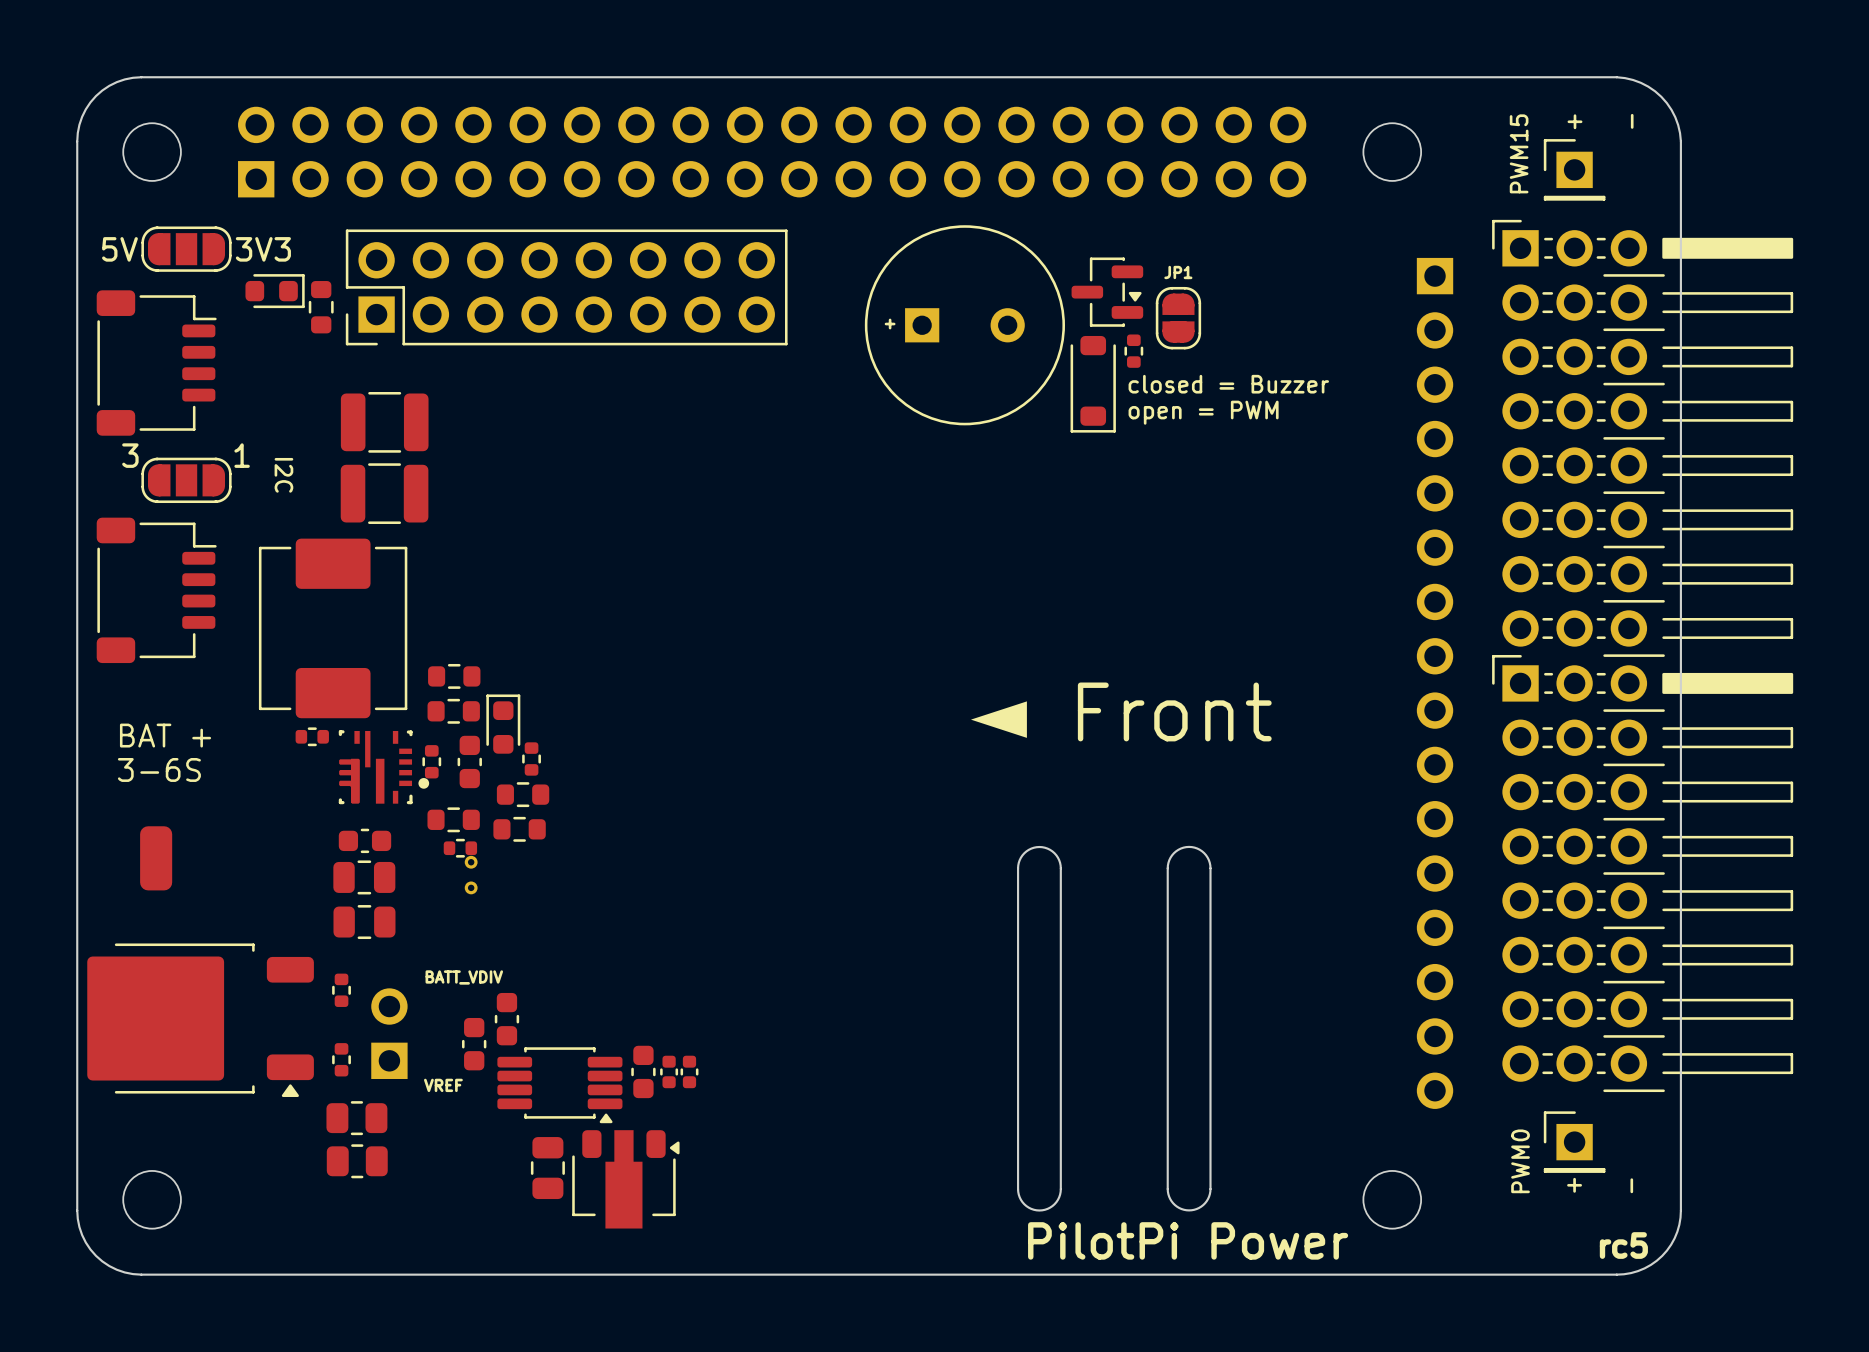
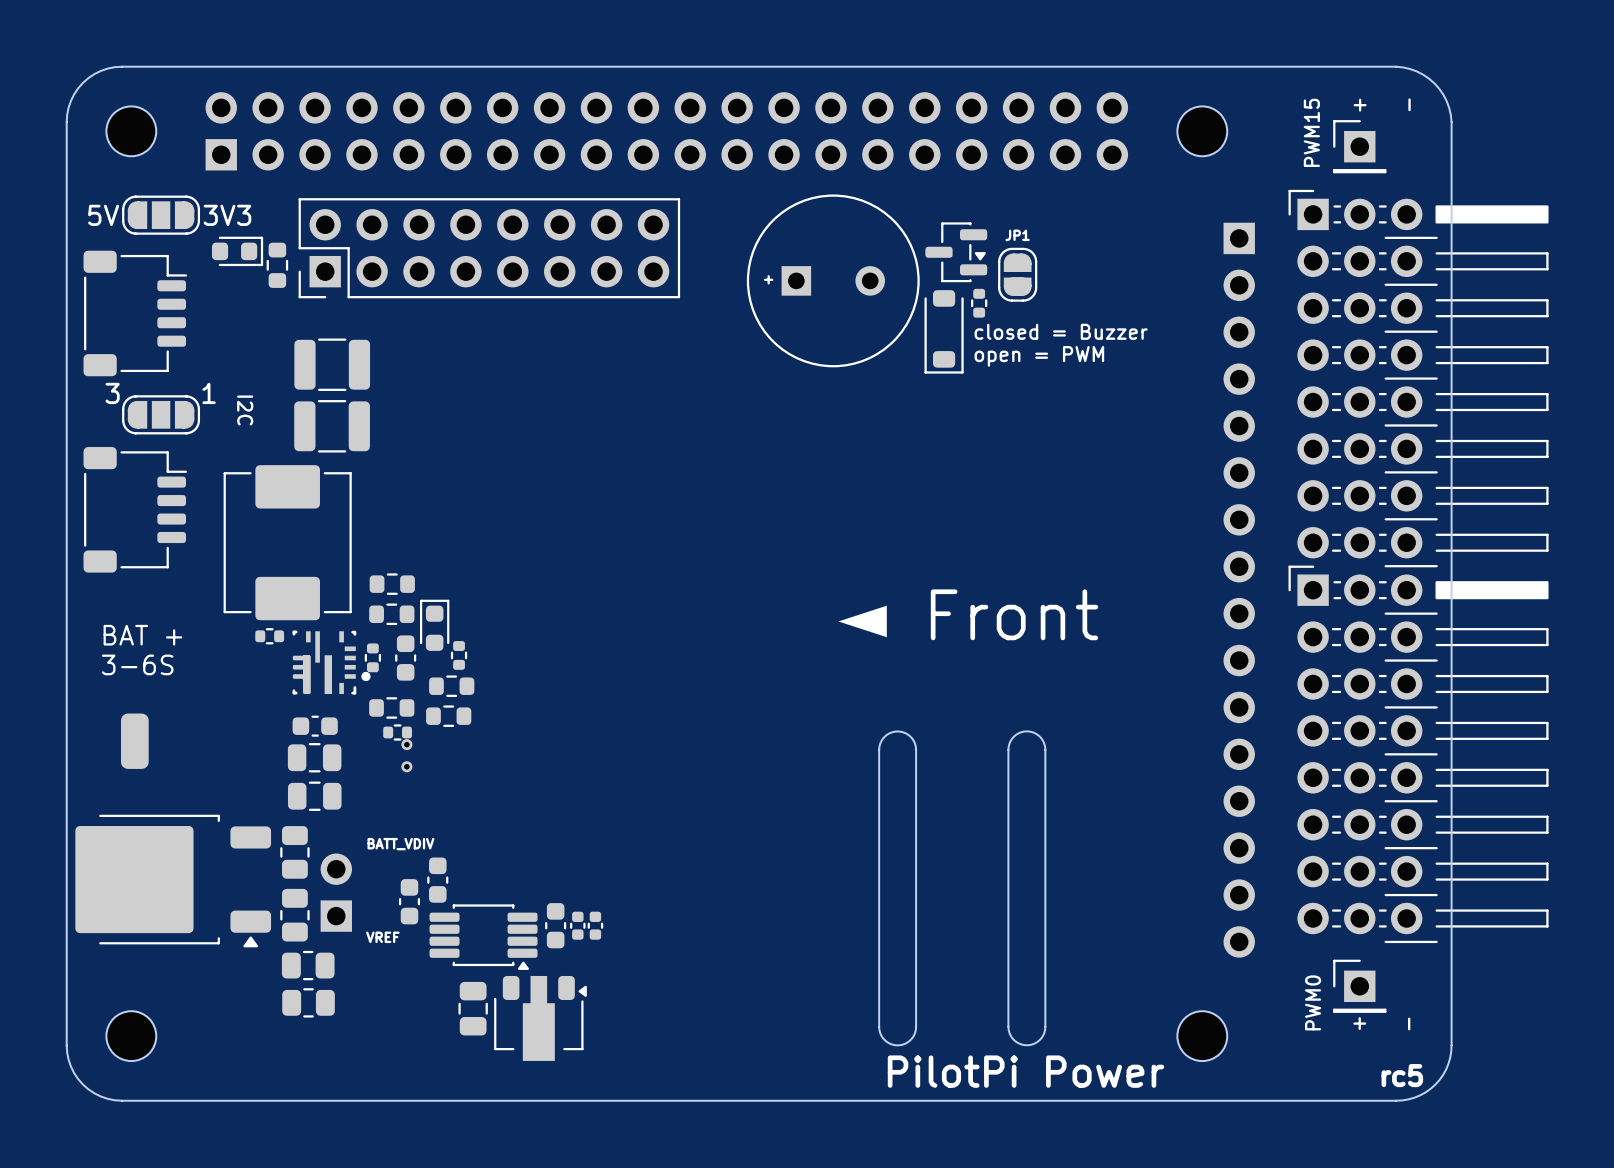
part footprint: [332, 973, 351, 1007] -> [280, 826, 310, 879]
part footprint: [332, 1043, 351, 1077] -> [280, 888, 310, 942]

